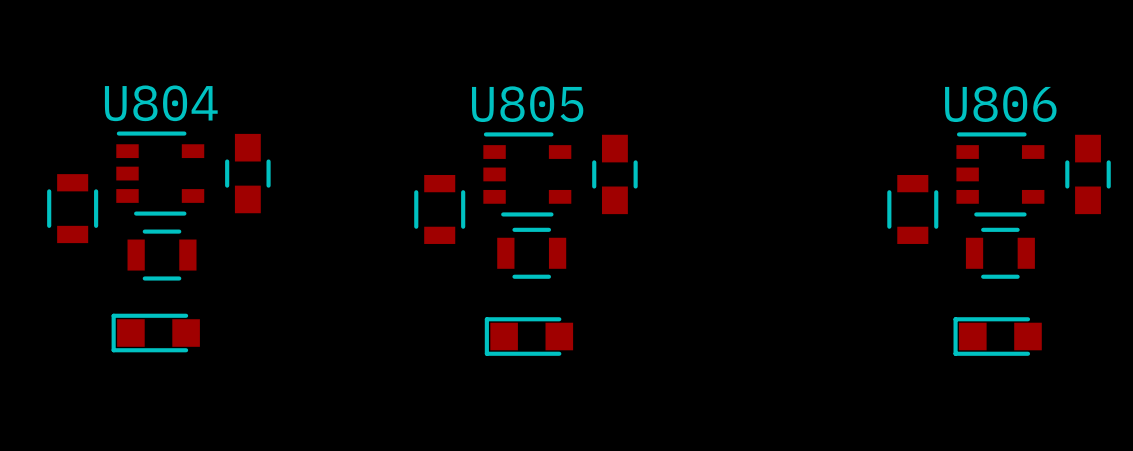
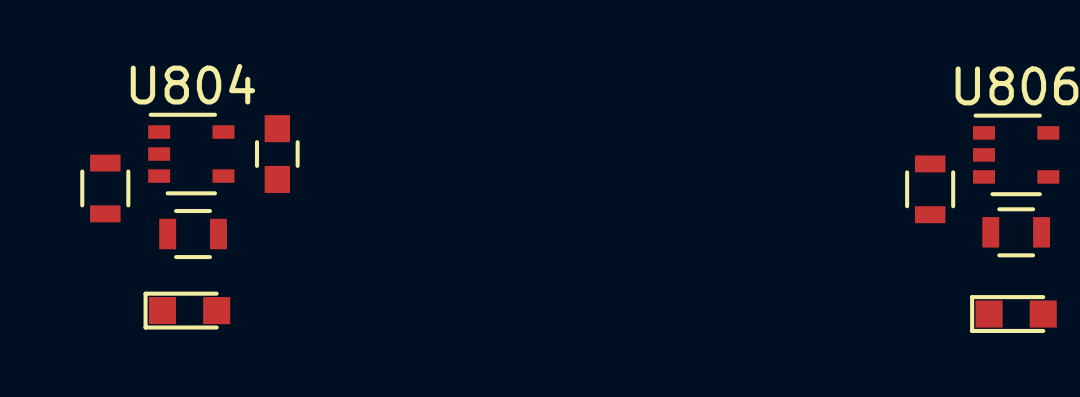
U805: (527, 174) -> none
part: (614, 174) -> none
part: (439, 209) -> none
part: (531, 253) -> none
part: (528, 336) -> none

